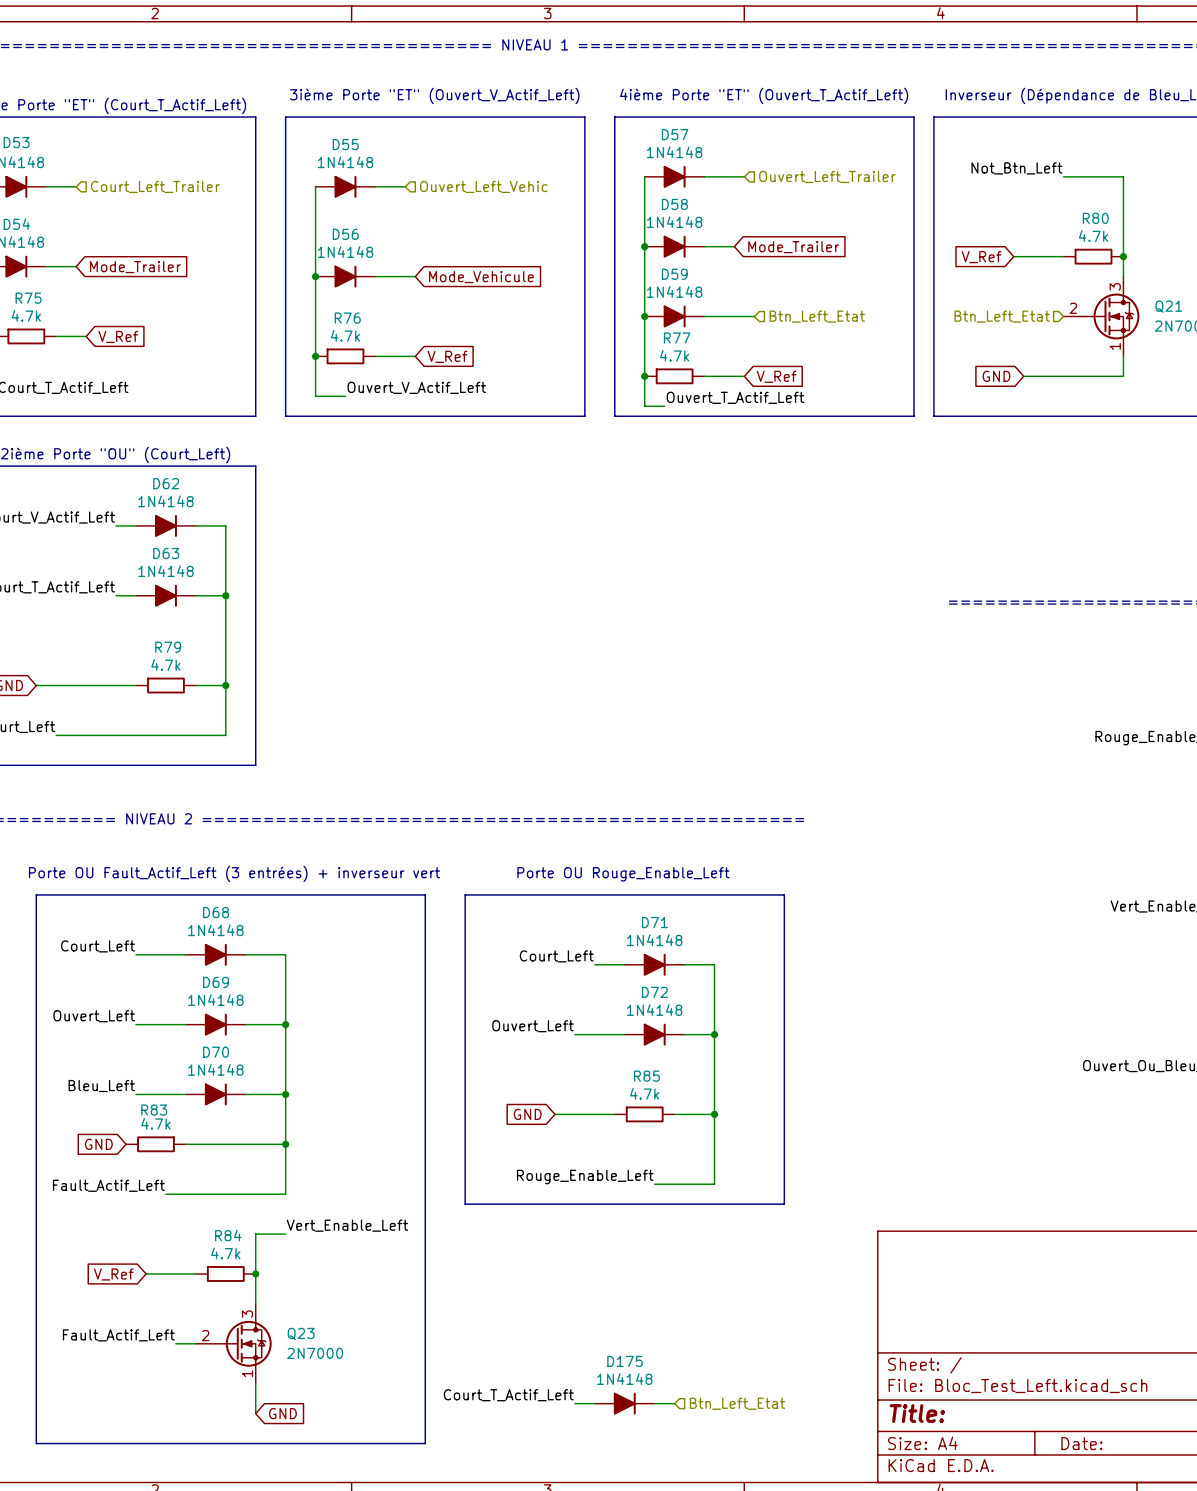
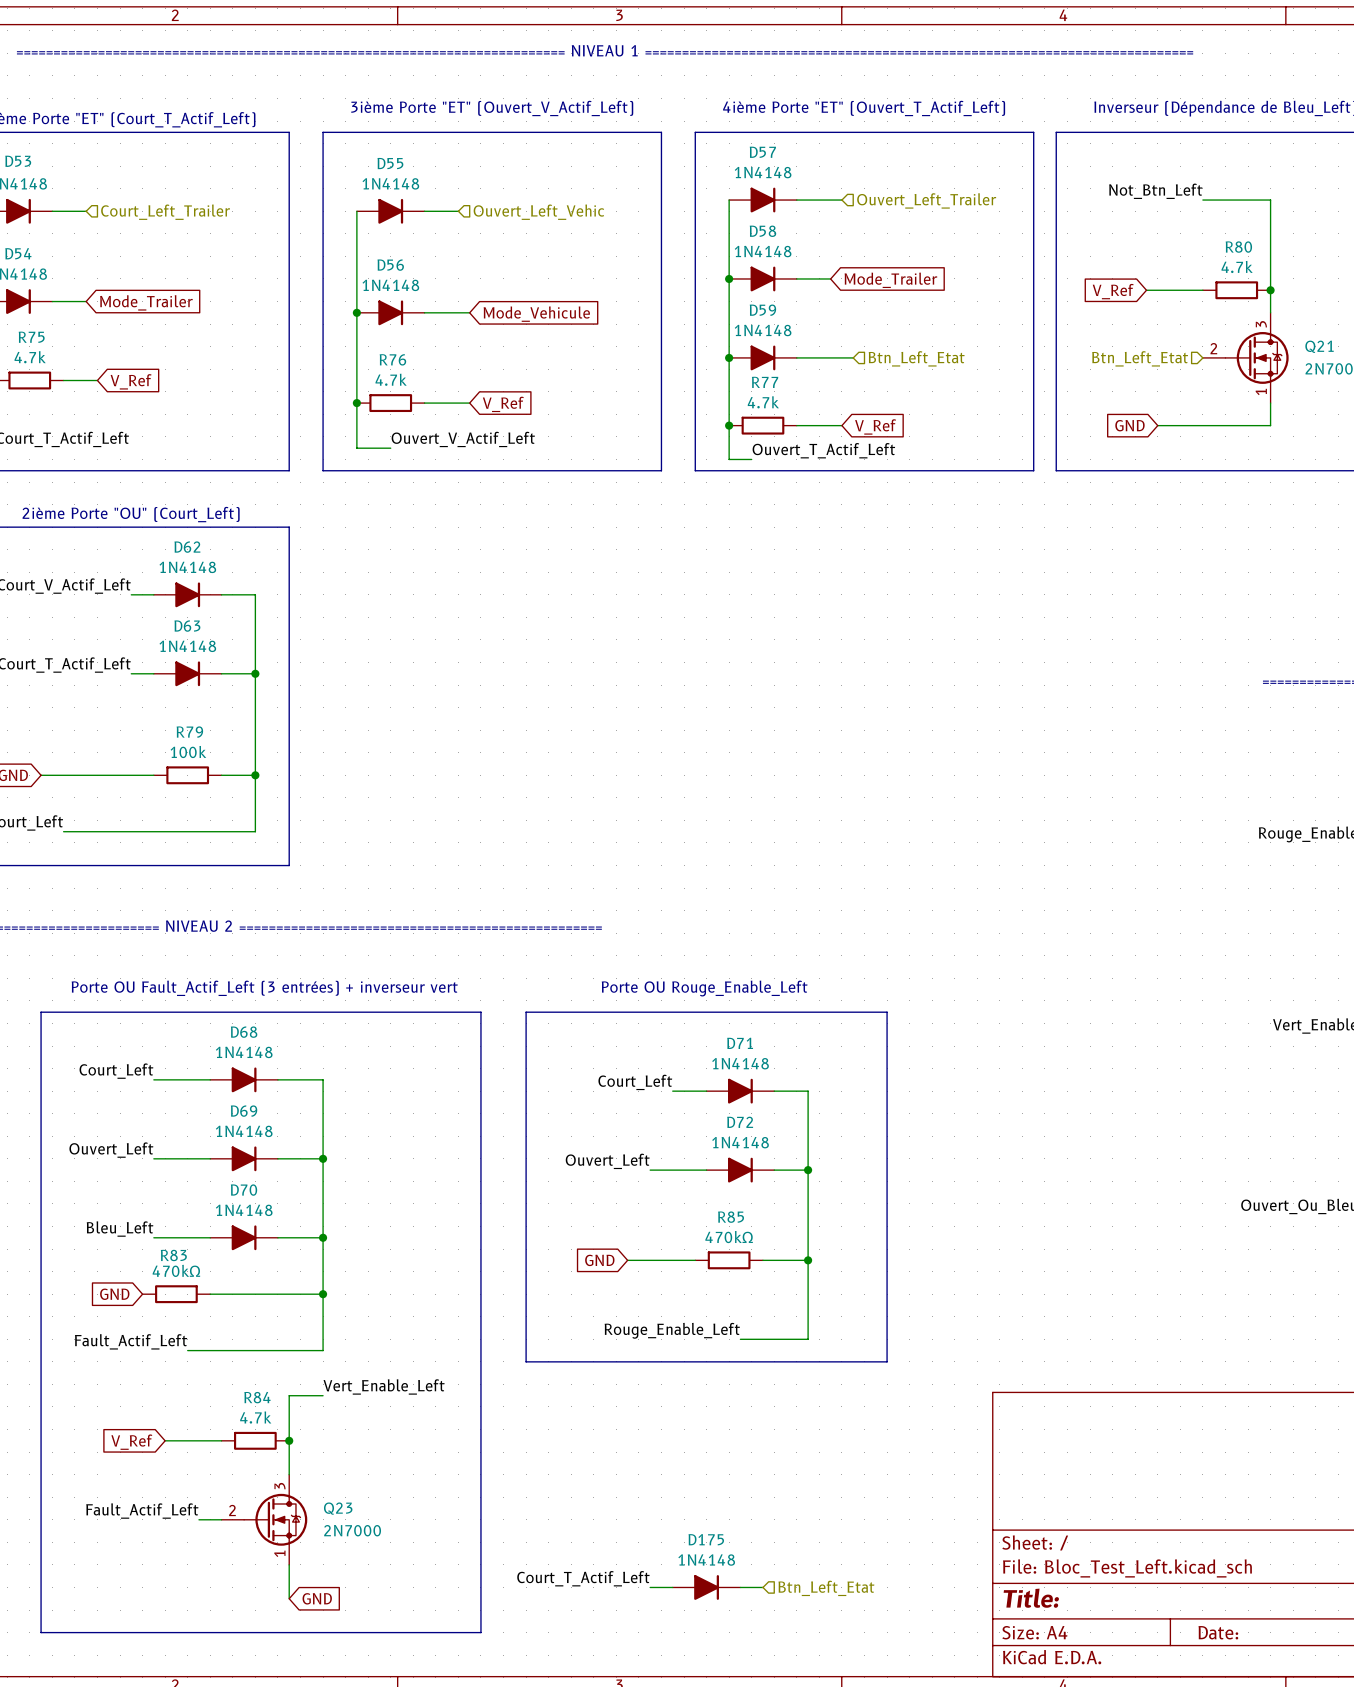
R79 value: 4.7k (165, 664) -> 100k (188, 752)
R85 value: 4.7k (644, 1093) -> 470kΩ (729, 1237)
R83 value: 4.7k (155, 1123) -> 470kΩ (176, 1270)

